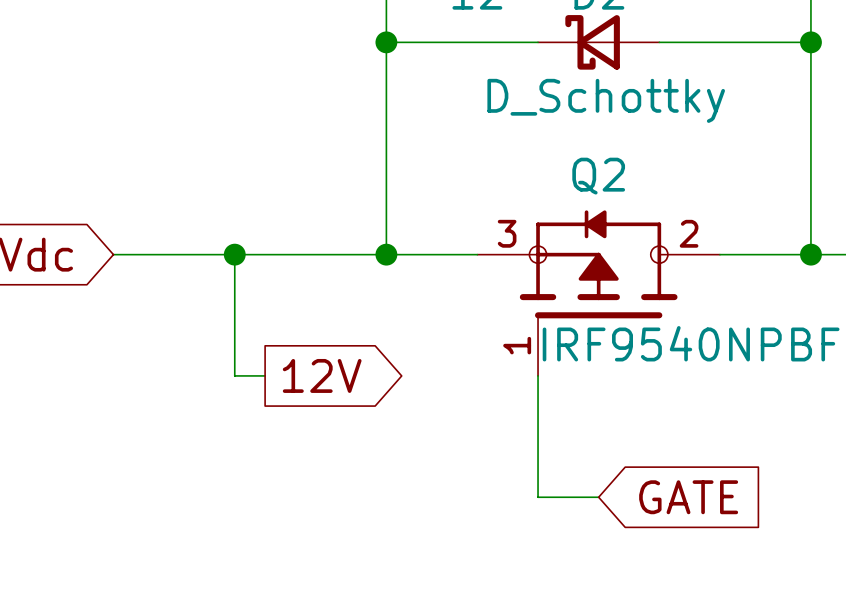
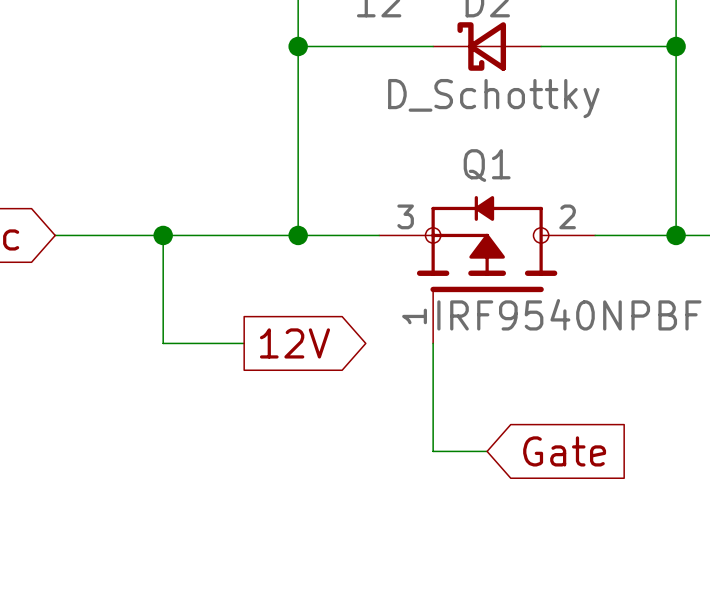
Q2 name: Q2 (598, 176) -> Q1 (487, 165)
wire: none -> (190, 343) (244, 343)
global label position: 12V (322, 375) -> 12V (294, 343)
global label: GATE (688, 497) -> Gate (564, 451)

